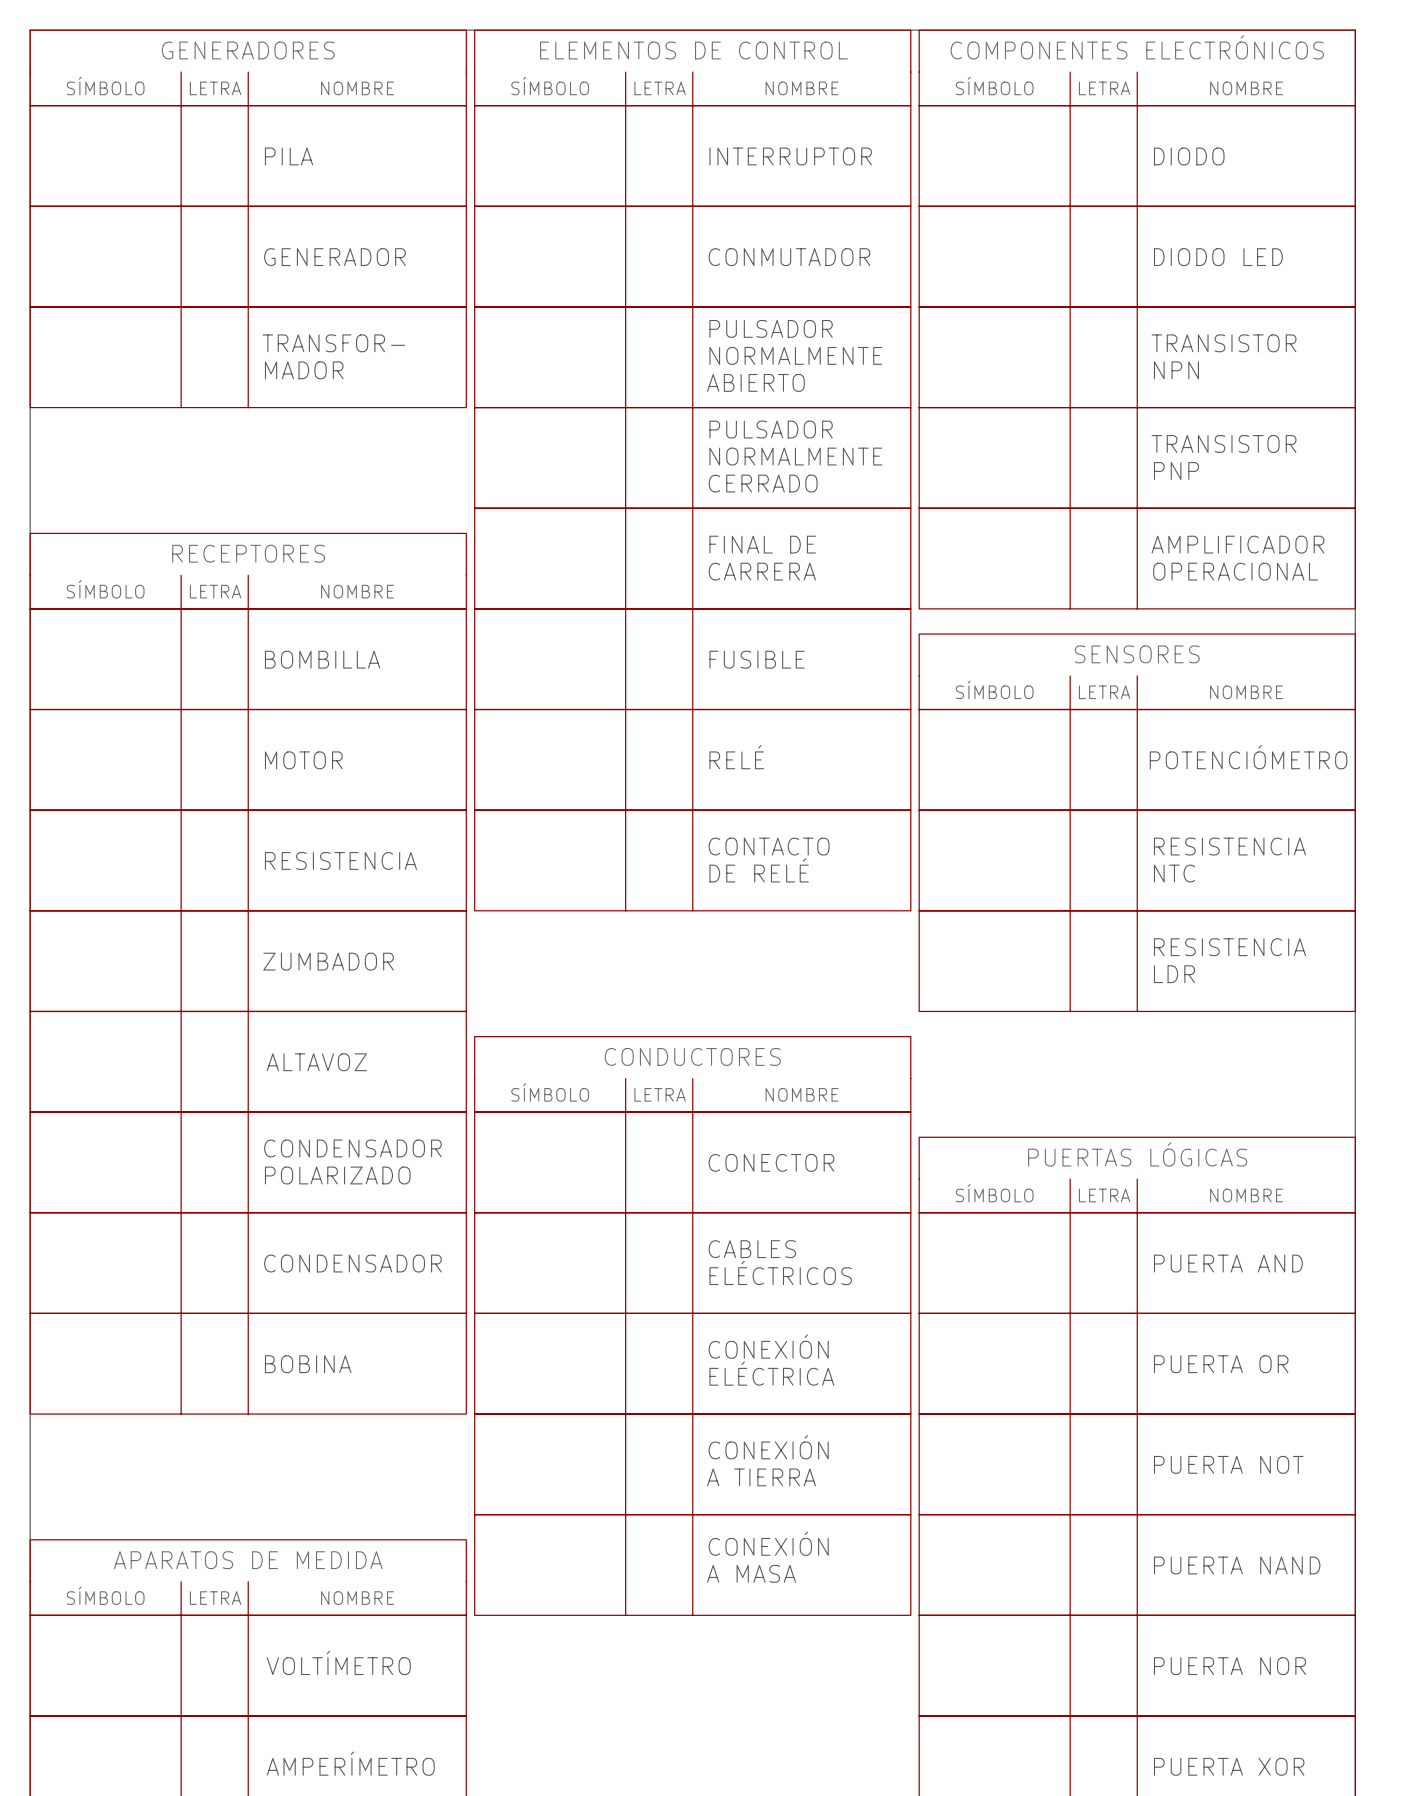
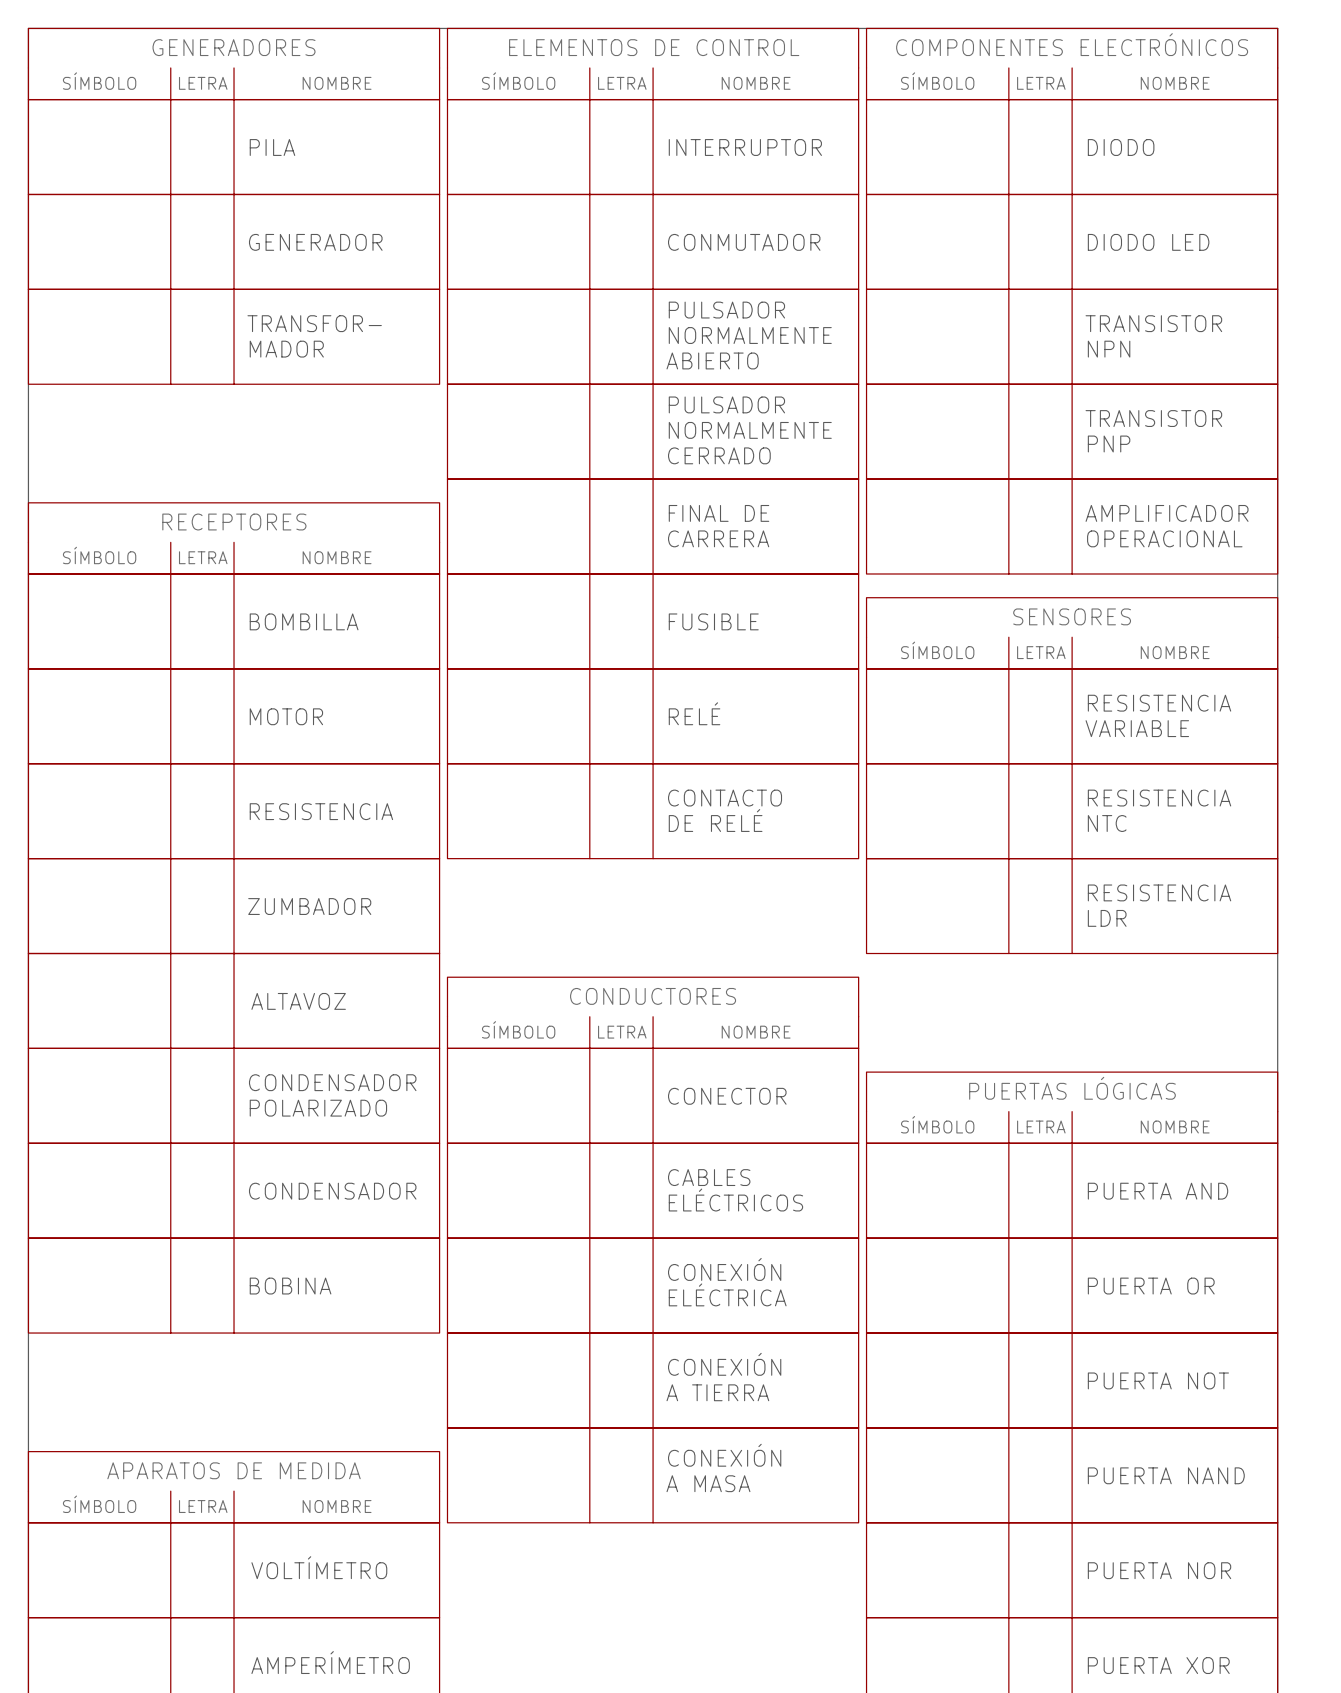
text: none -> RESISTENCIA (1159, 703)
text: POTENCIÓMETRO (1248, 757) -> none
text: none -> VARIABLE (1137, 728)

